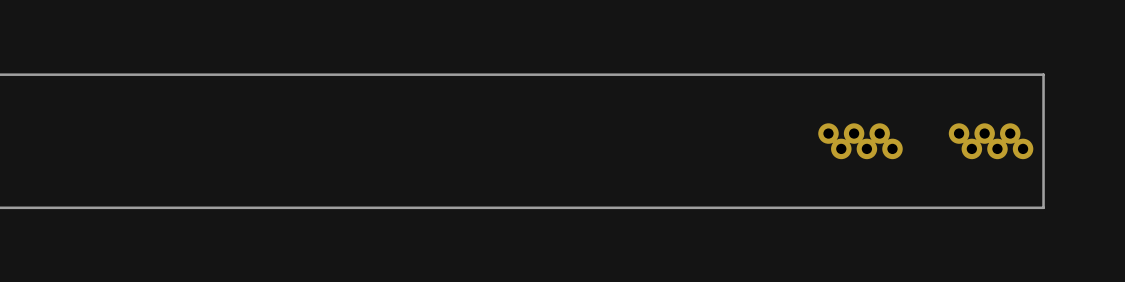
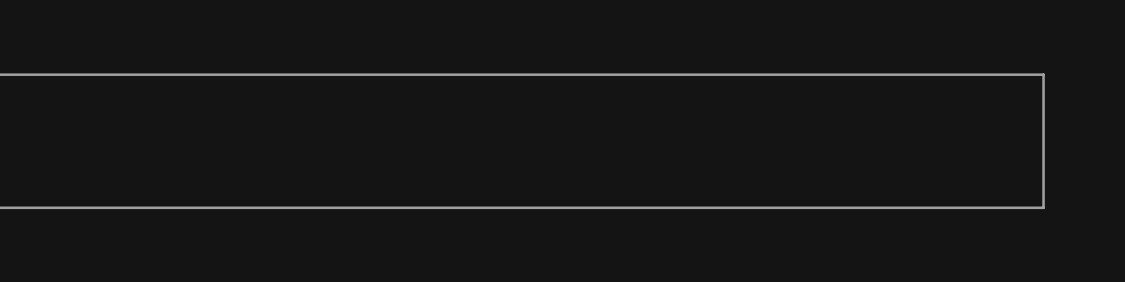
via: (828, 133) -> none
via: (854, 133) -> none
via: (879, 133) -> none
via: (959, 133) -> none
via: (984, 133) -> none
via: (1010, 133) -> none
via: (841, 148) -> none
via: (866, 148) -> none
via: (892, 148) -> none
via: (971, 148) -> none
via: (997, 148) -> none
via: (1023, 148) -> none

